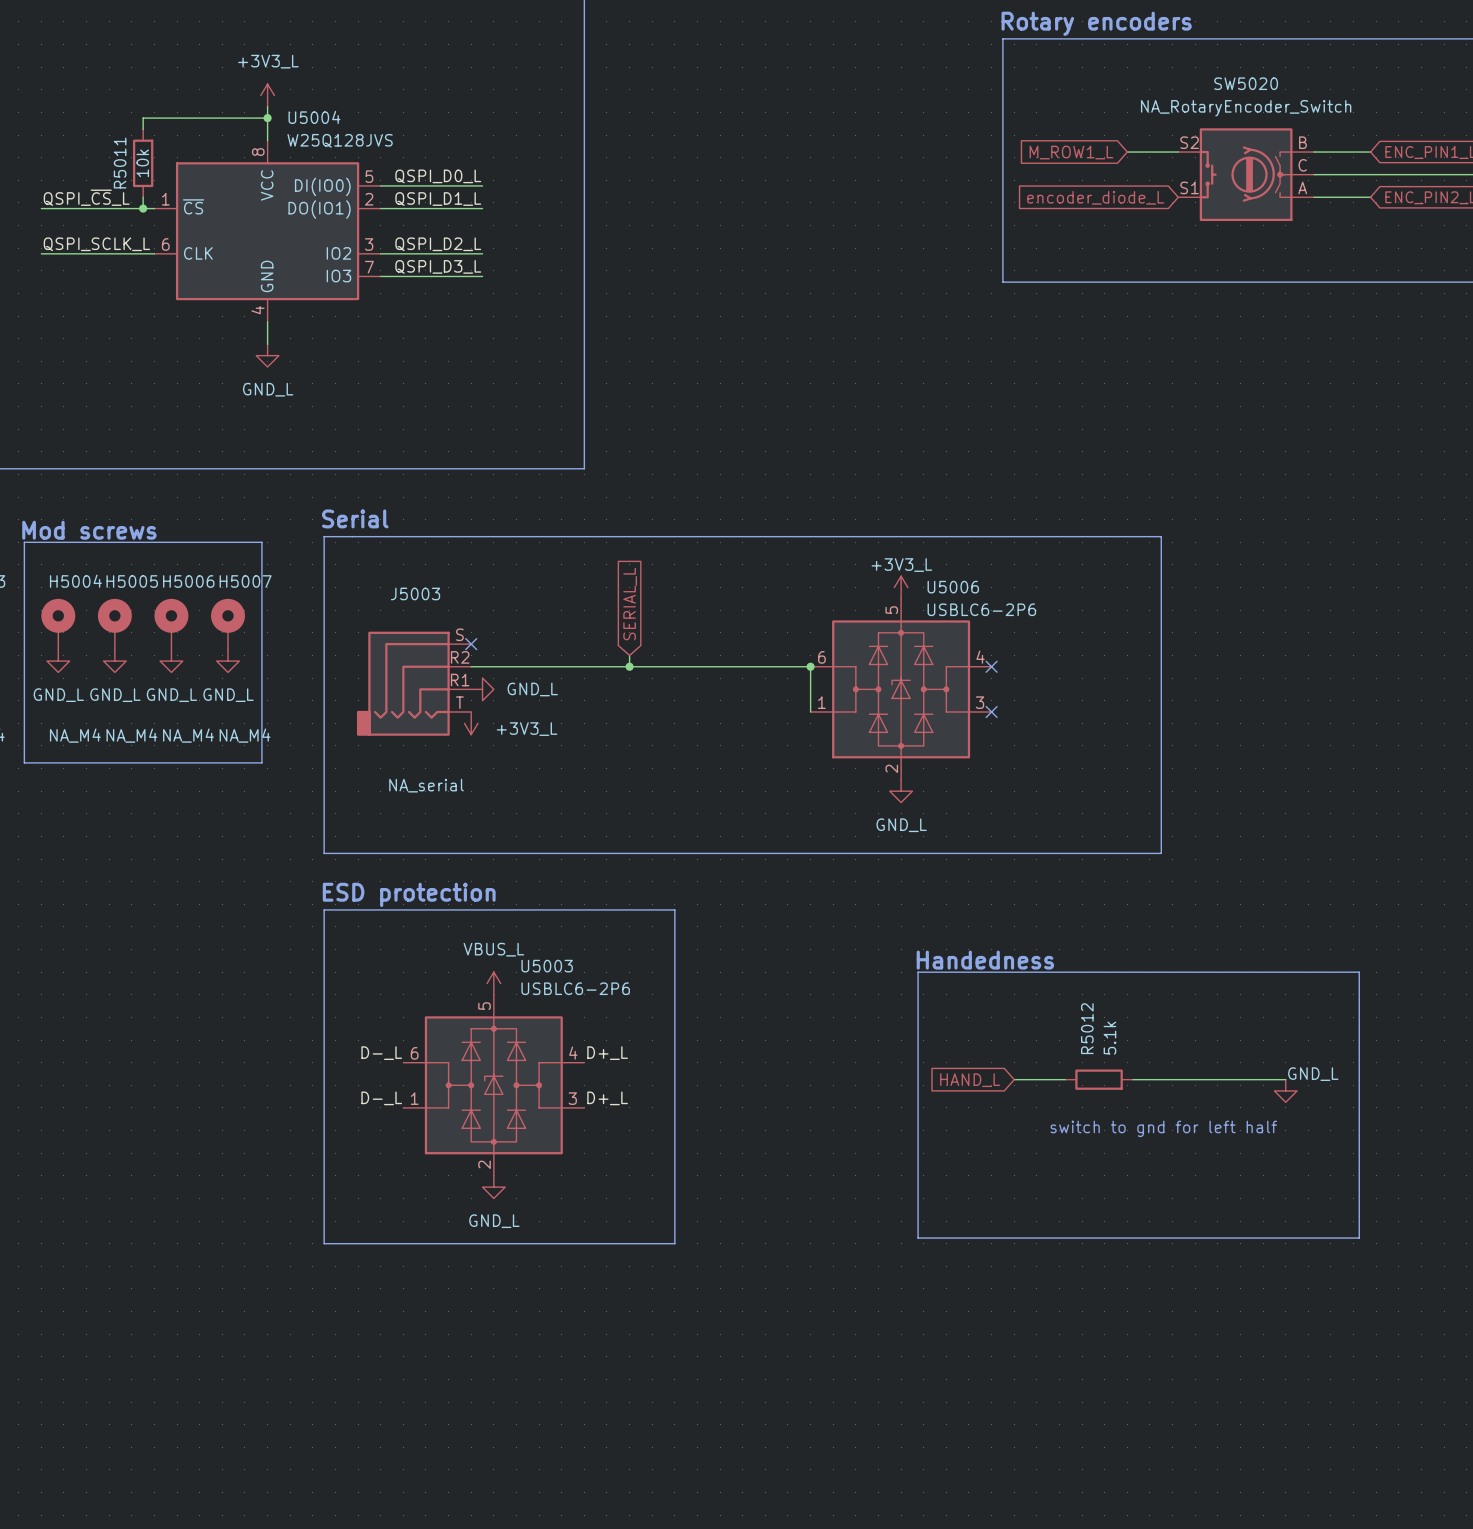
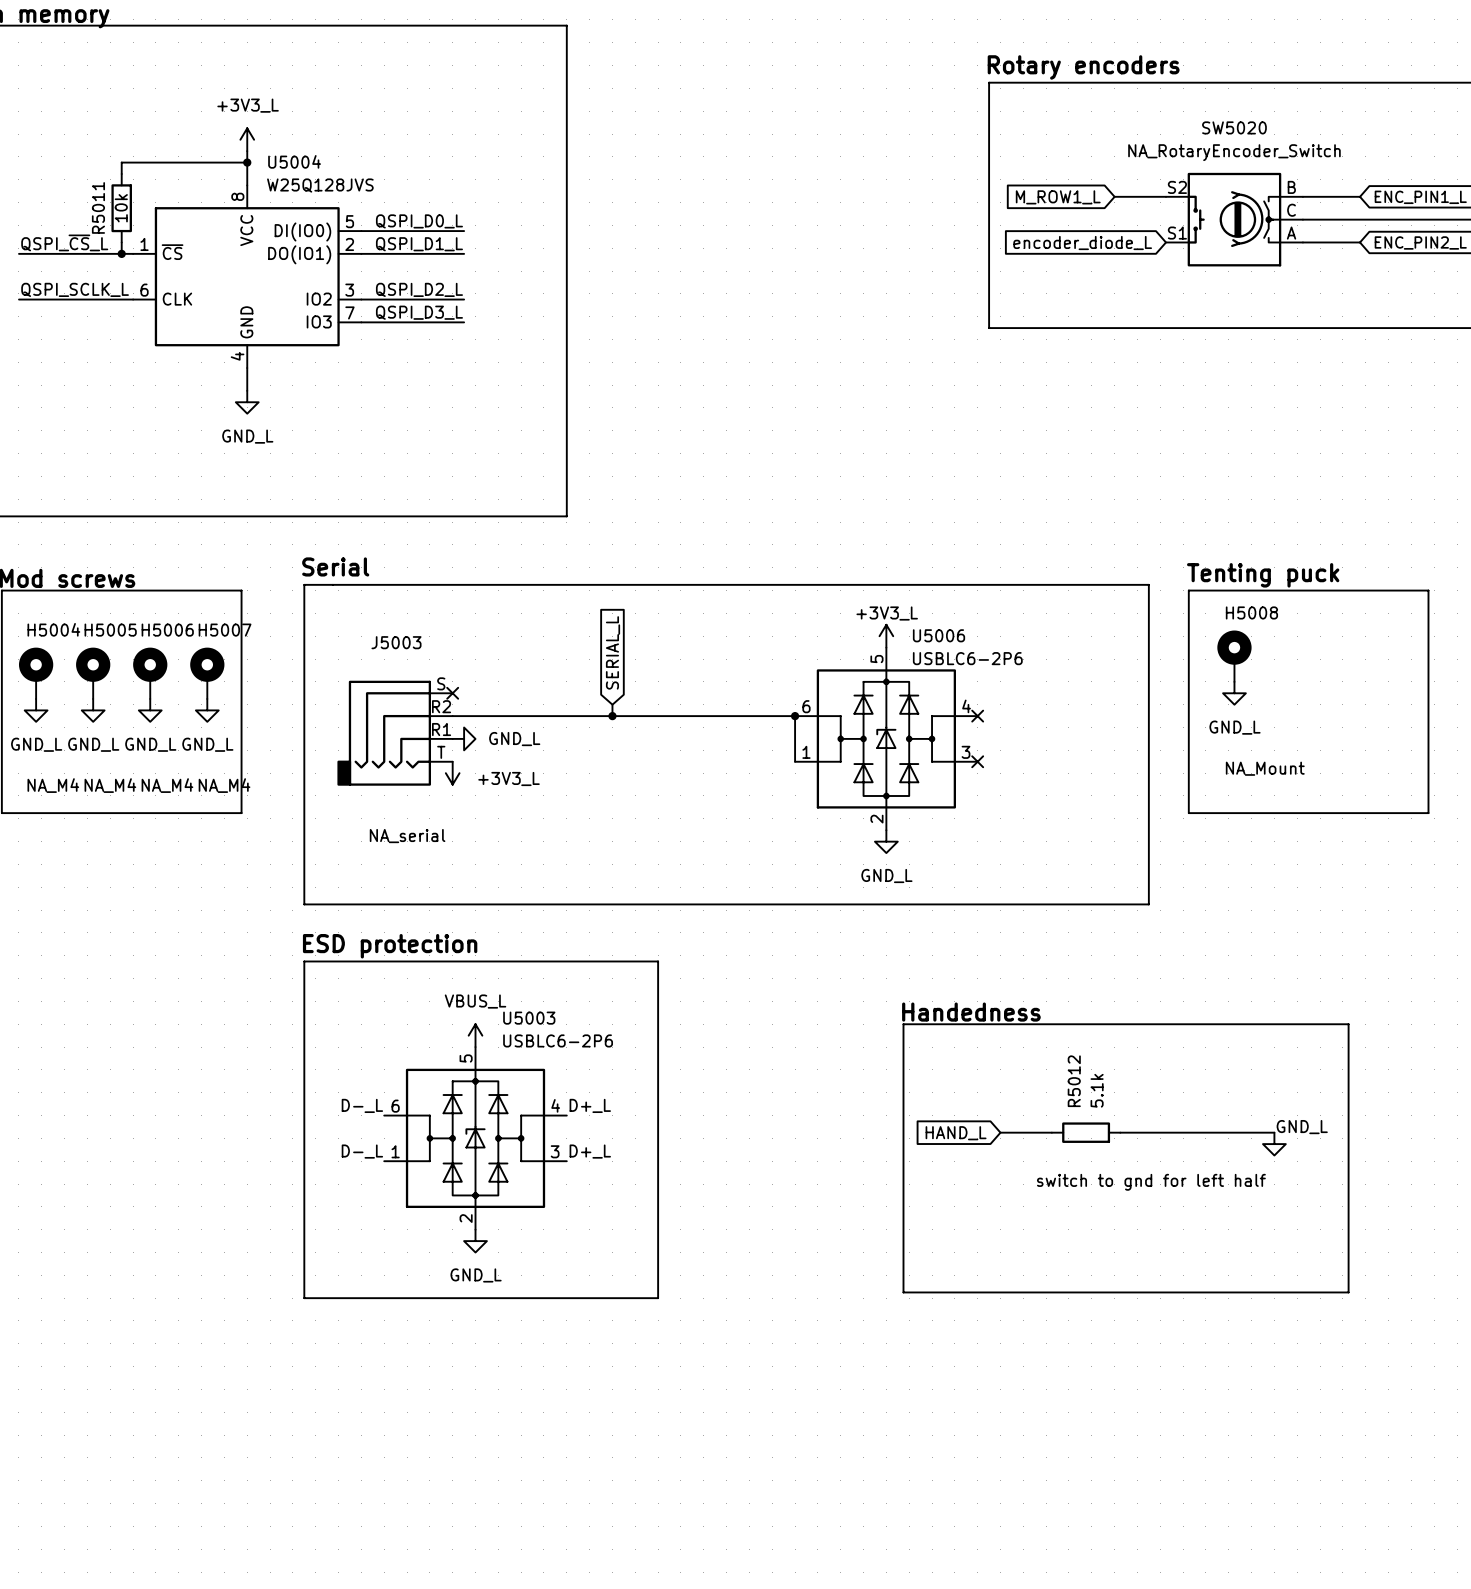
text: none -> Tenting puck (1263, 575)
line: none -> (1188, 590) (1188, 813) (1428, 813) (1428, 590) (1188, 590)
H5008: none -> NA_Mount (1234, 656)
power symbol: none -> GND_L (1234, 693)

